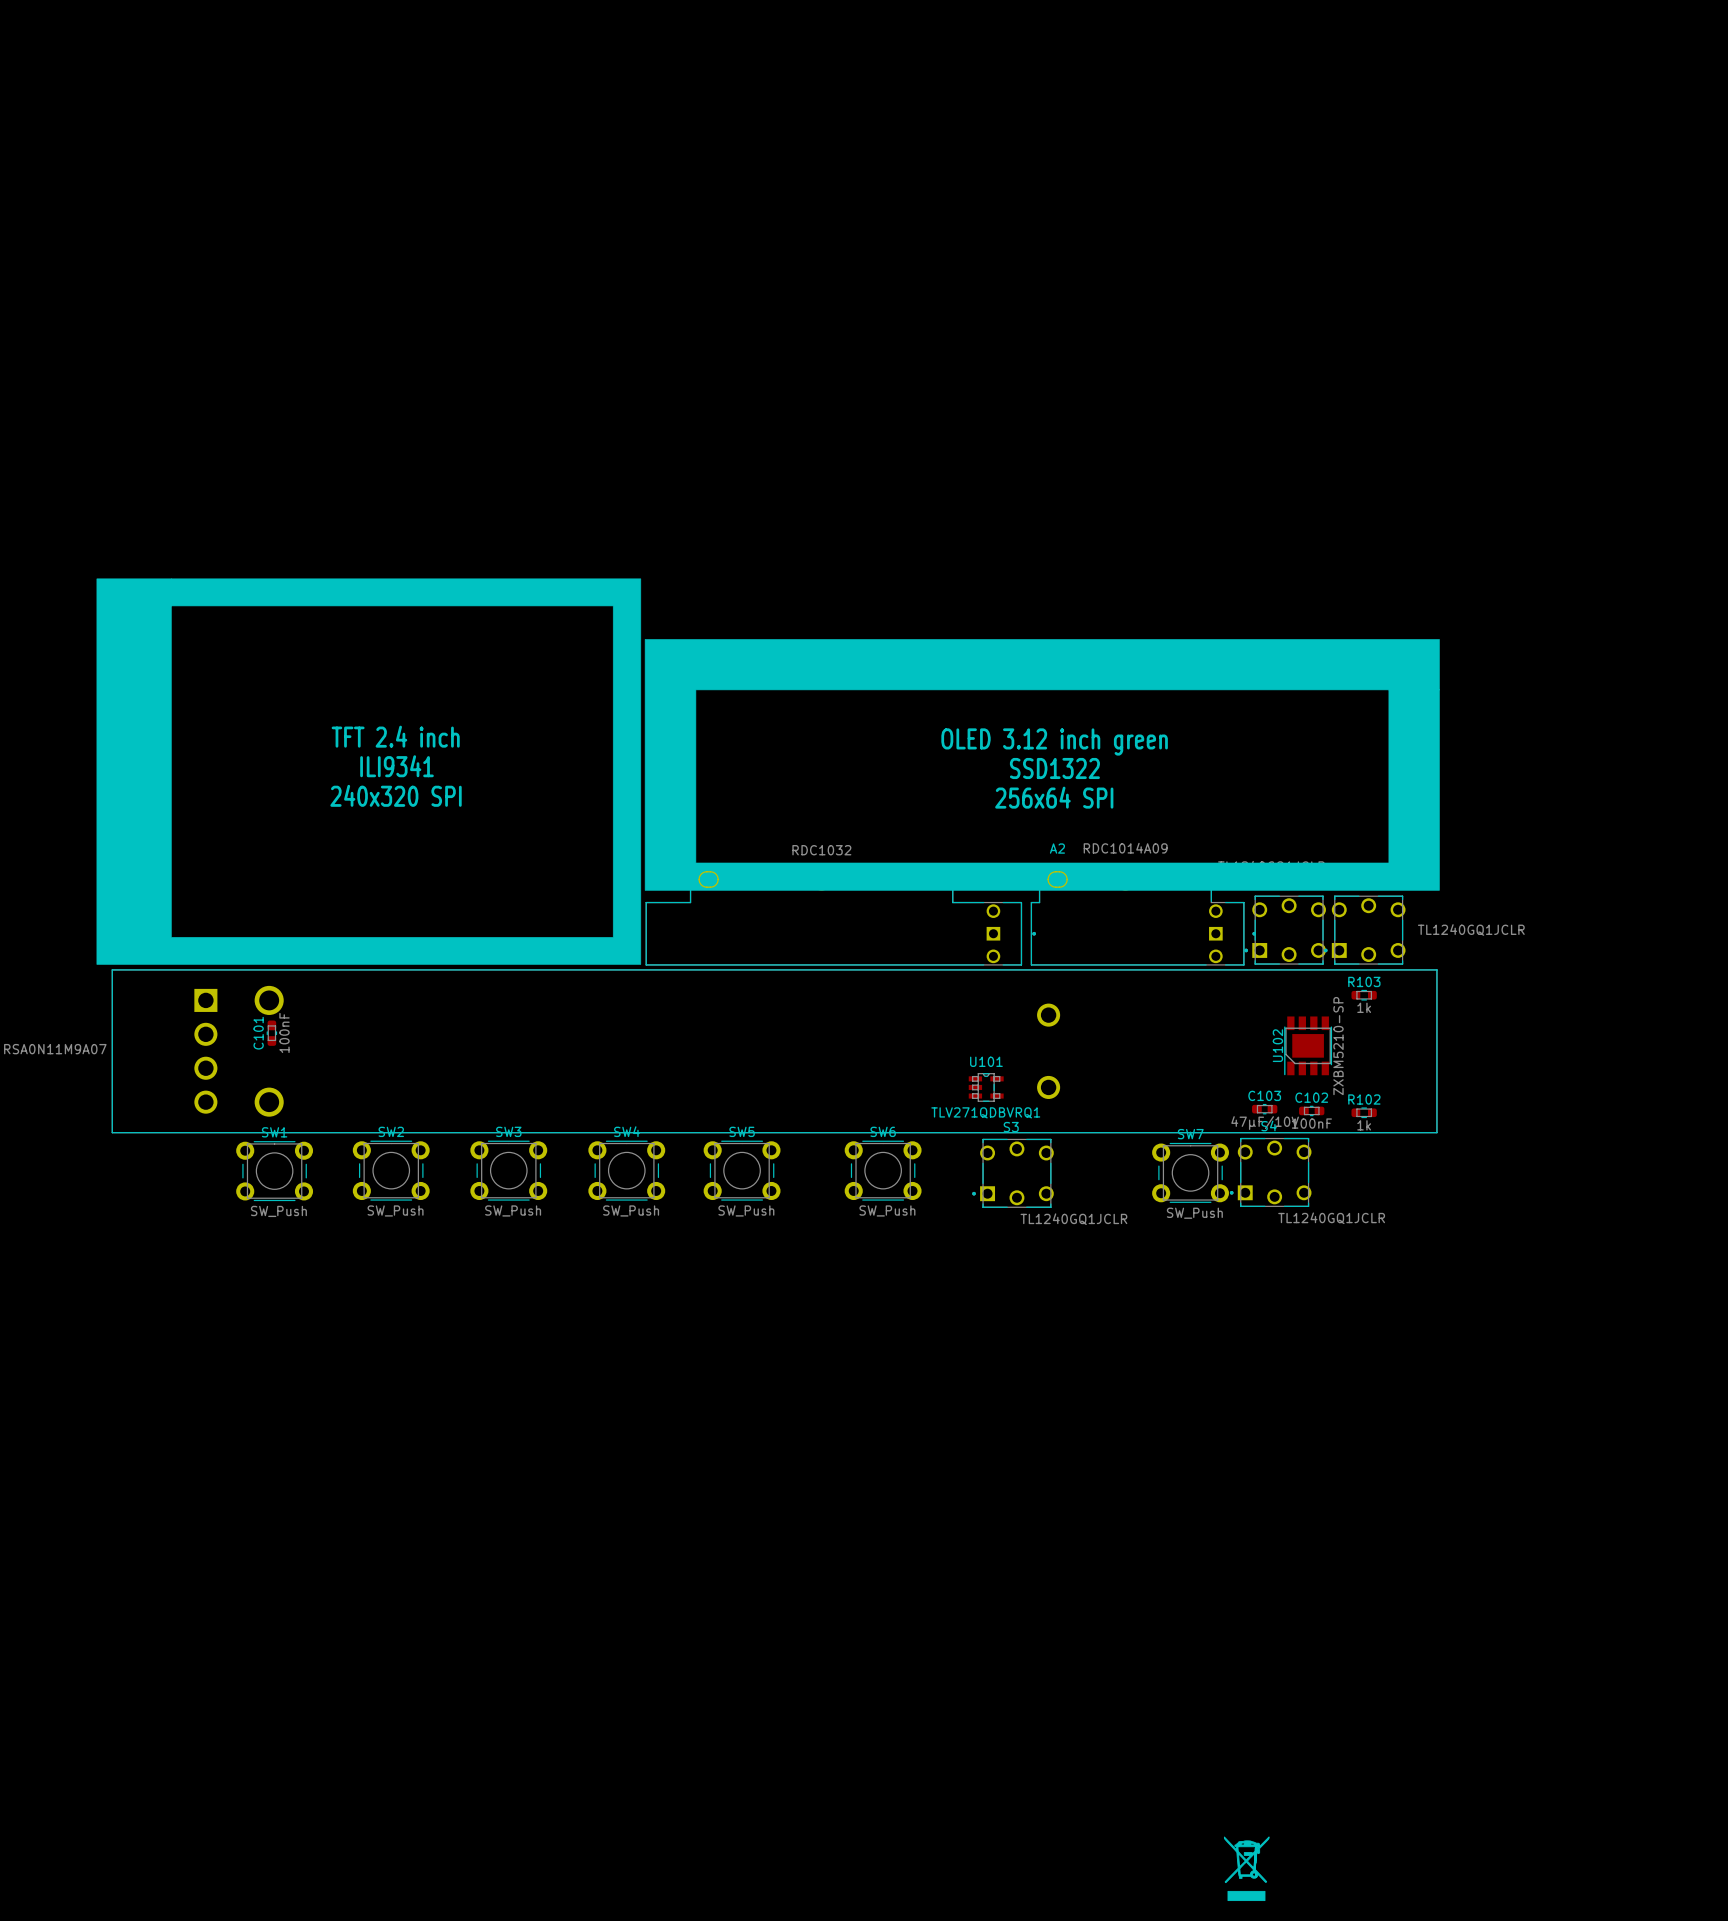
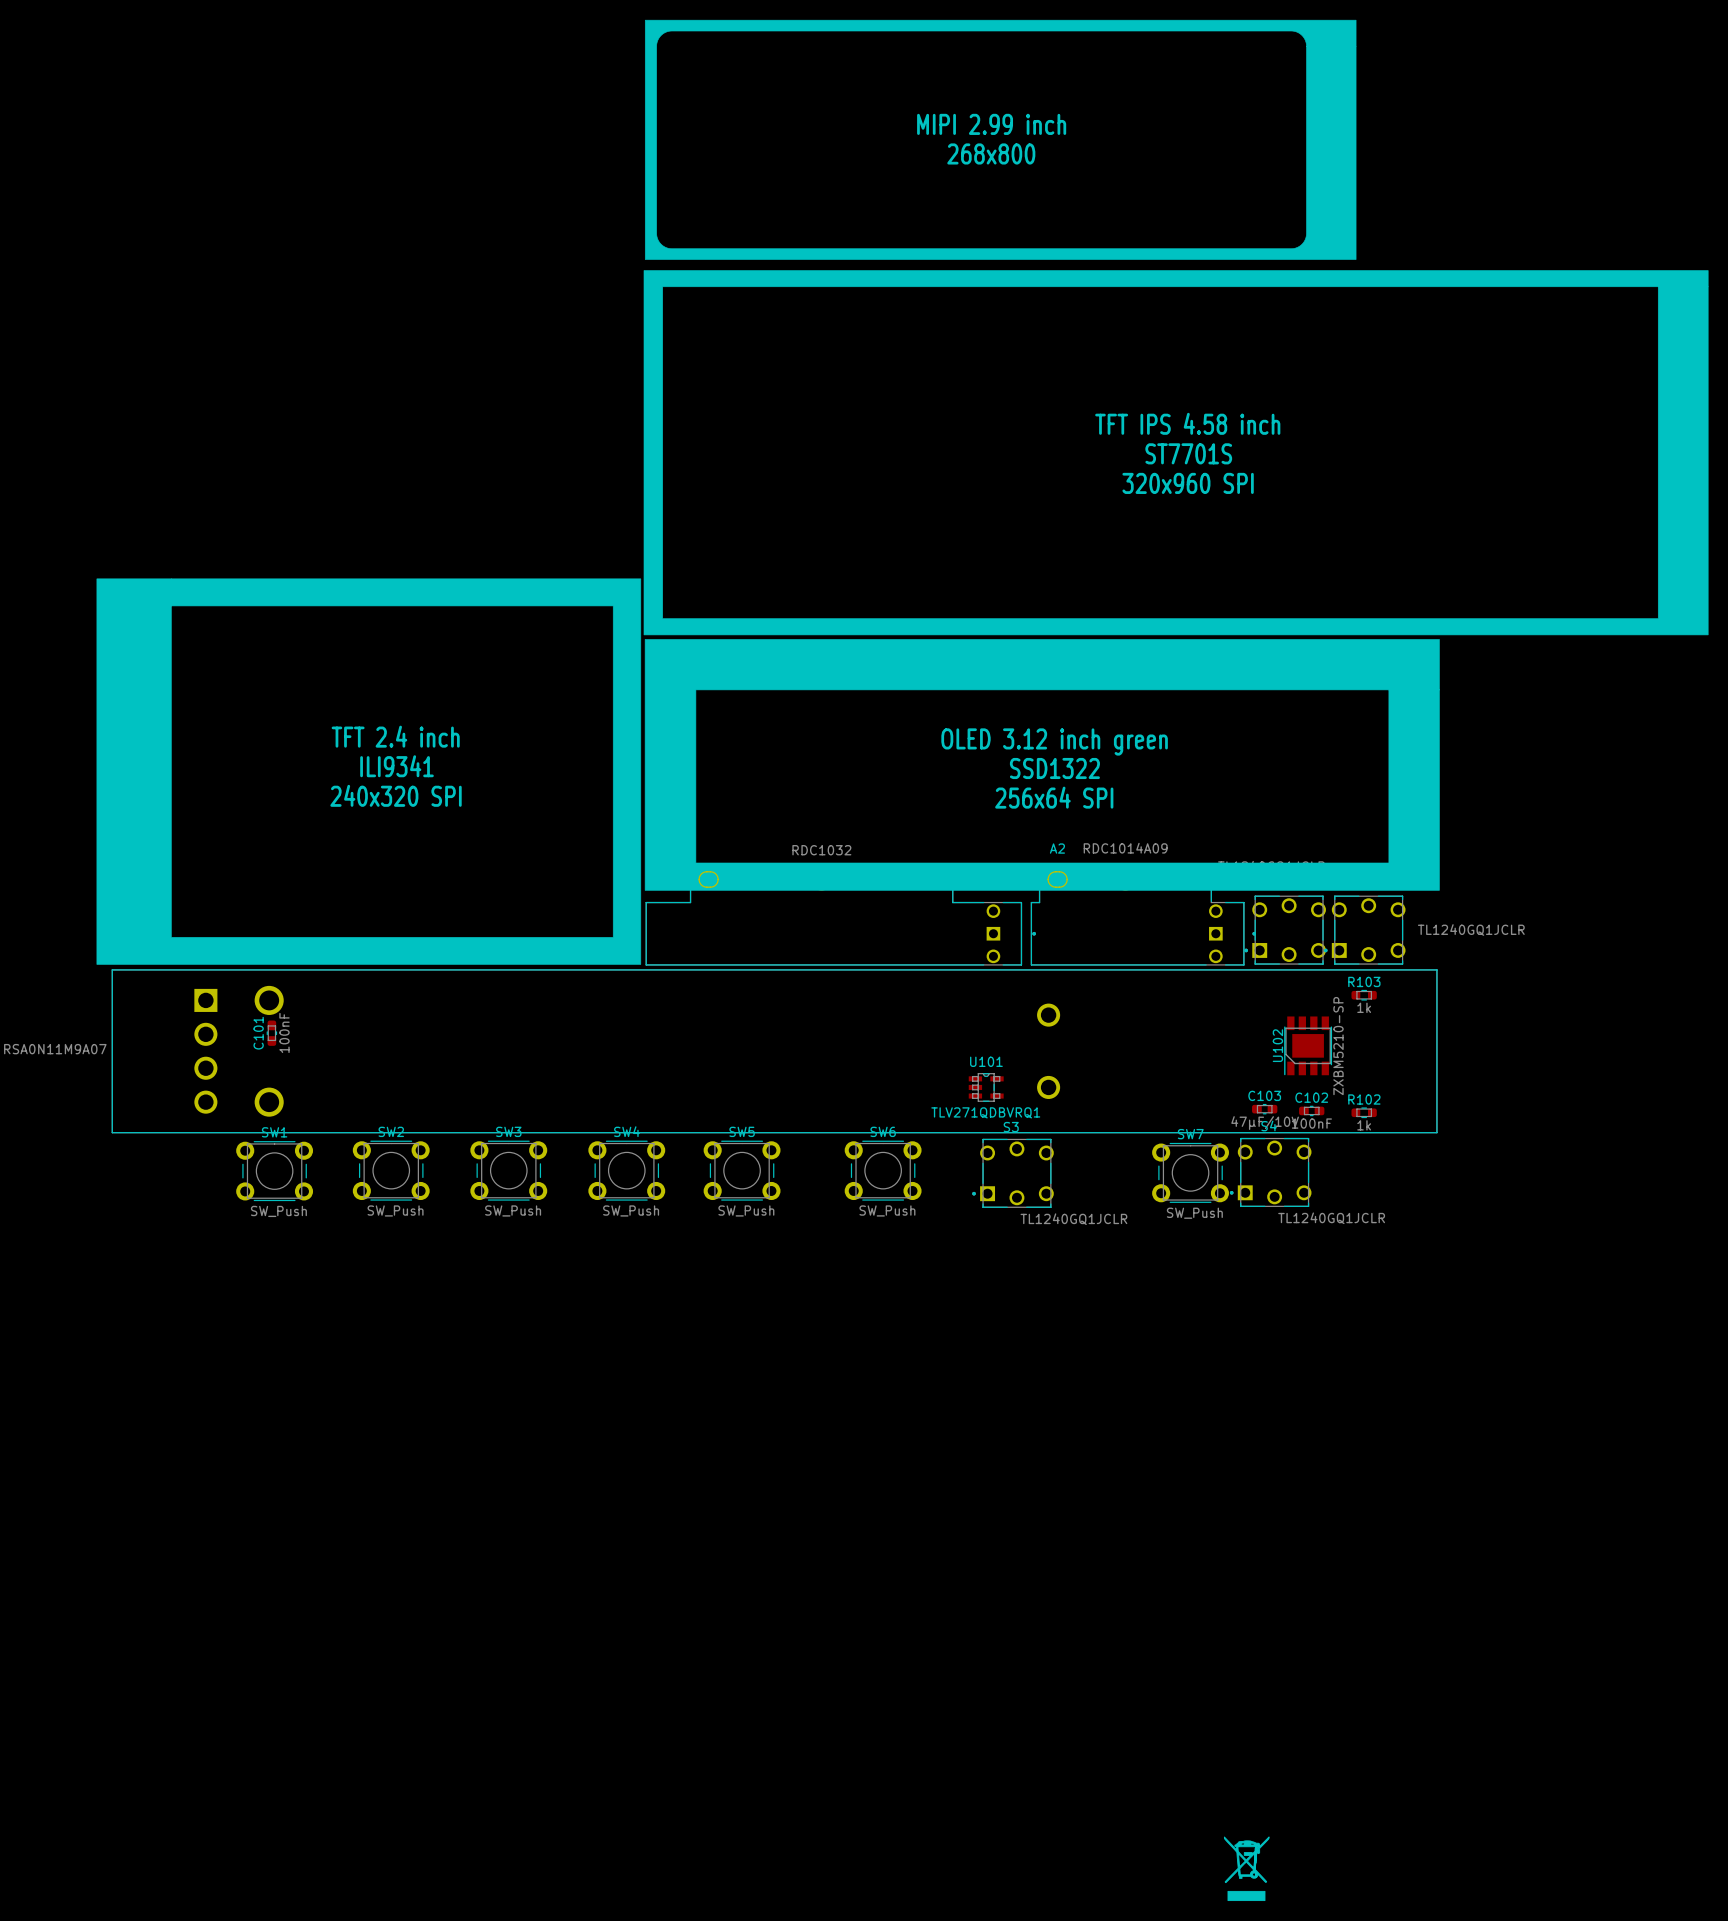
drawing: none -> [643, 19, 1709, 636]
text: none -> MIPI 2.99 inch (991, 124)
text: none -> 268x800 (991, 153)
text: none -> TFT IPS 4.58 inch (1187, 423)
text: none -> ST7701S (1188, 453)
text: none -> 320x960 SPI (1188, 483)

